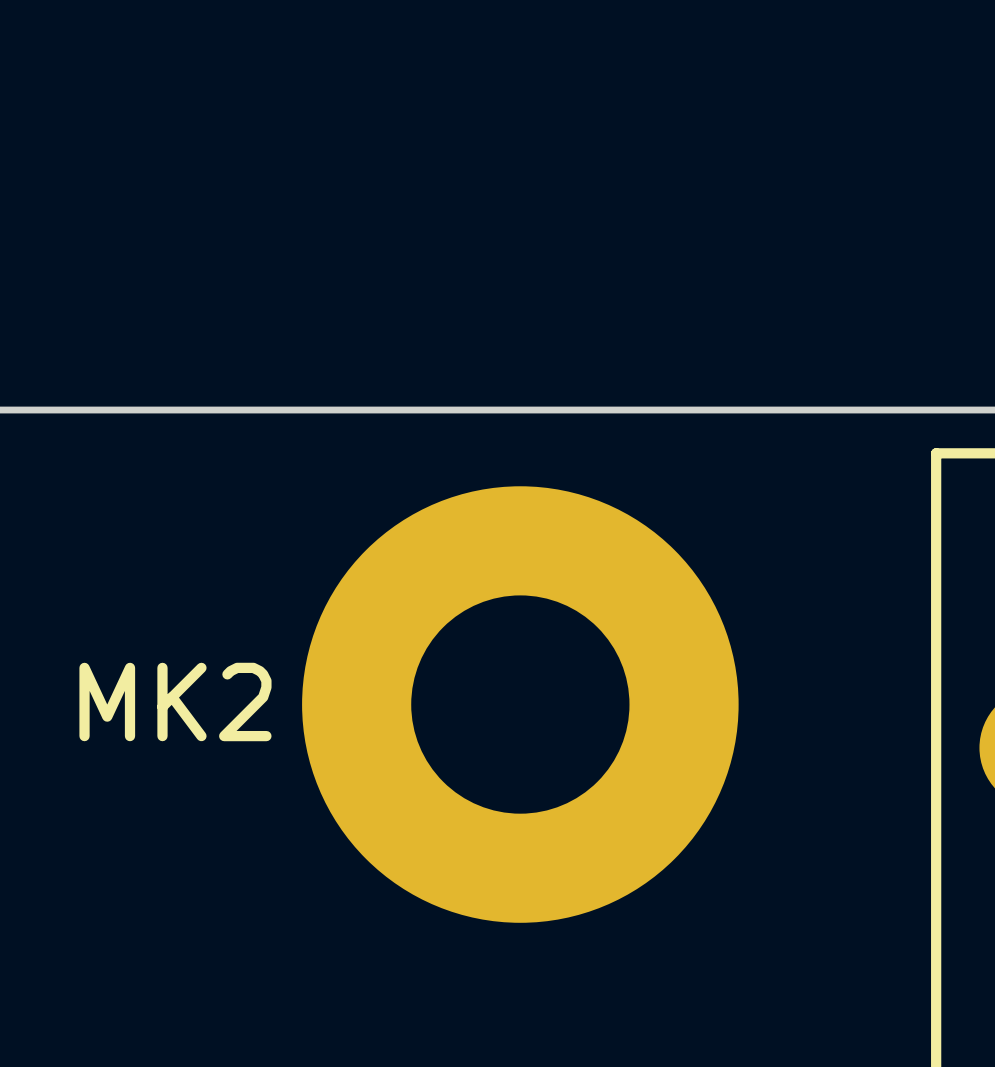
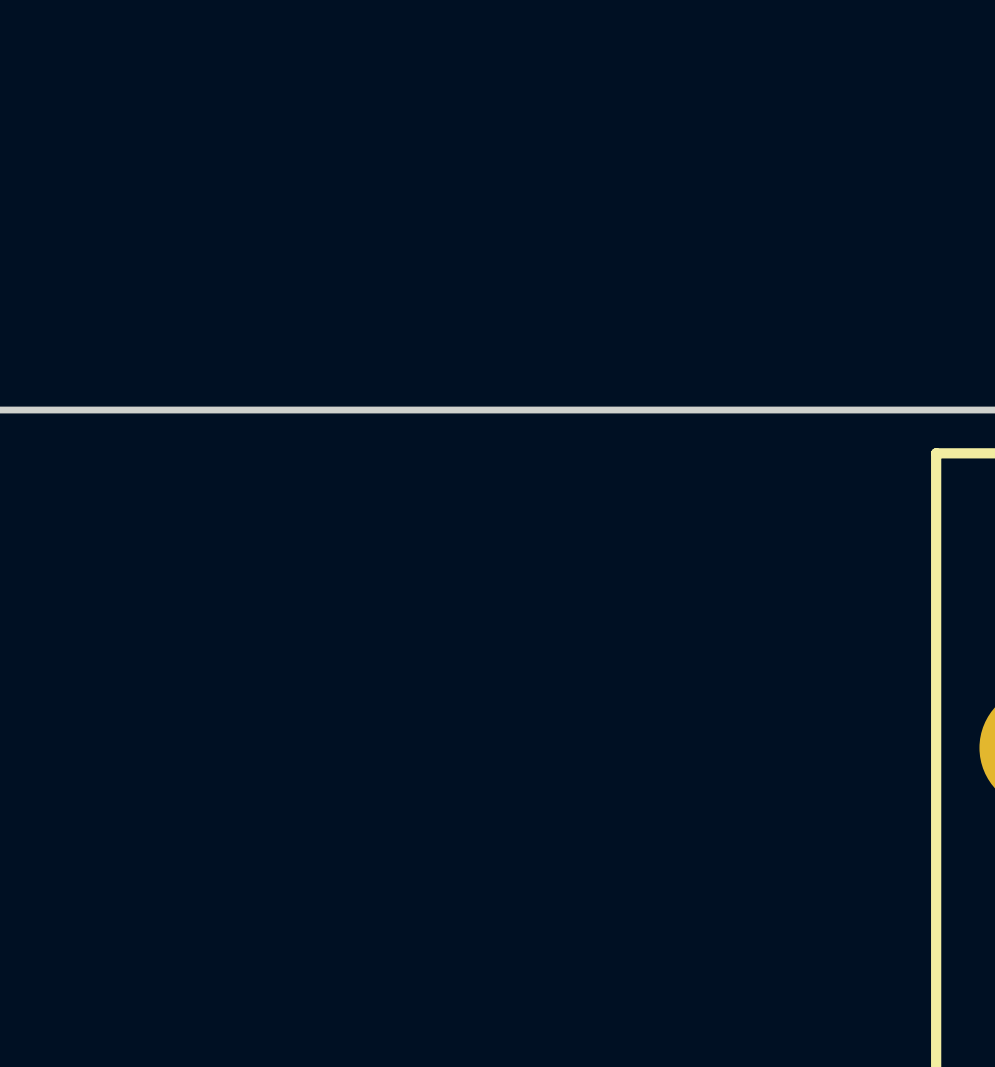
MK2: (520, 704) -> none

